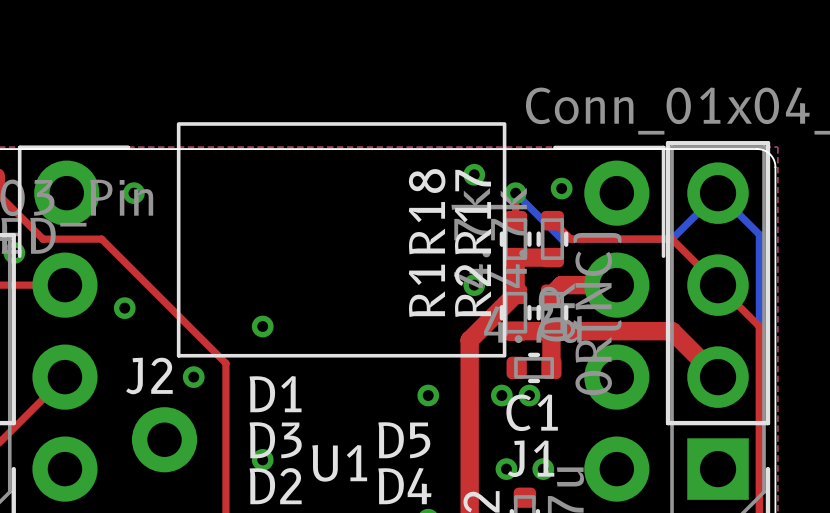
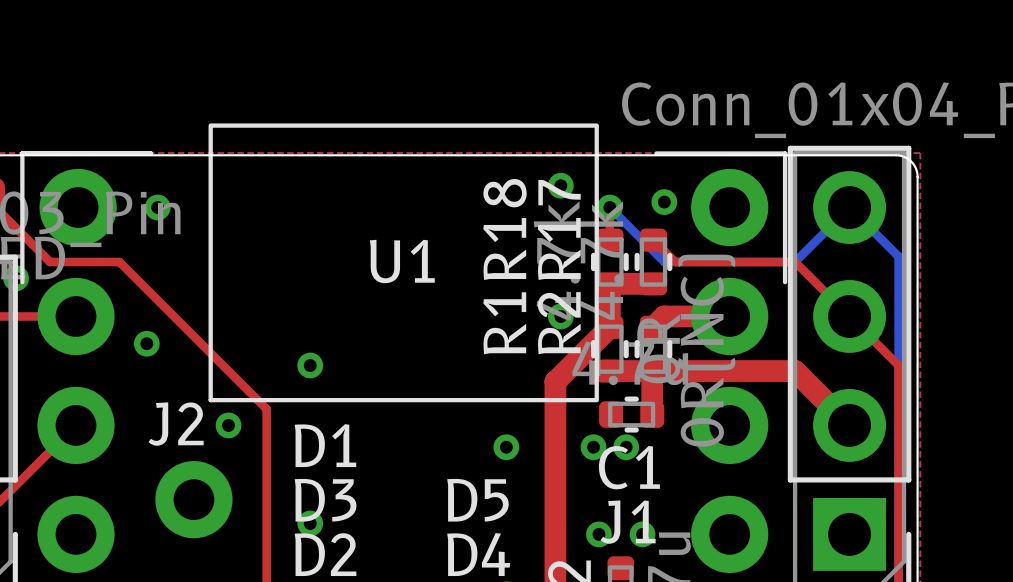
U1 name position: U1 (339, 463) -> U1 (402, 261)

